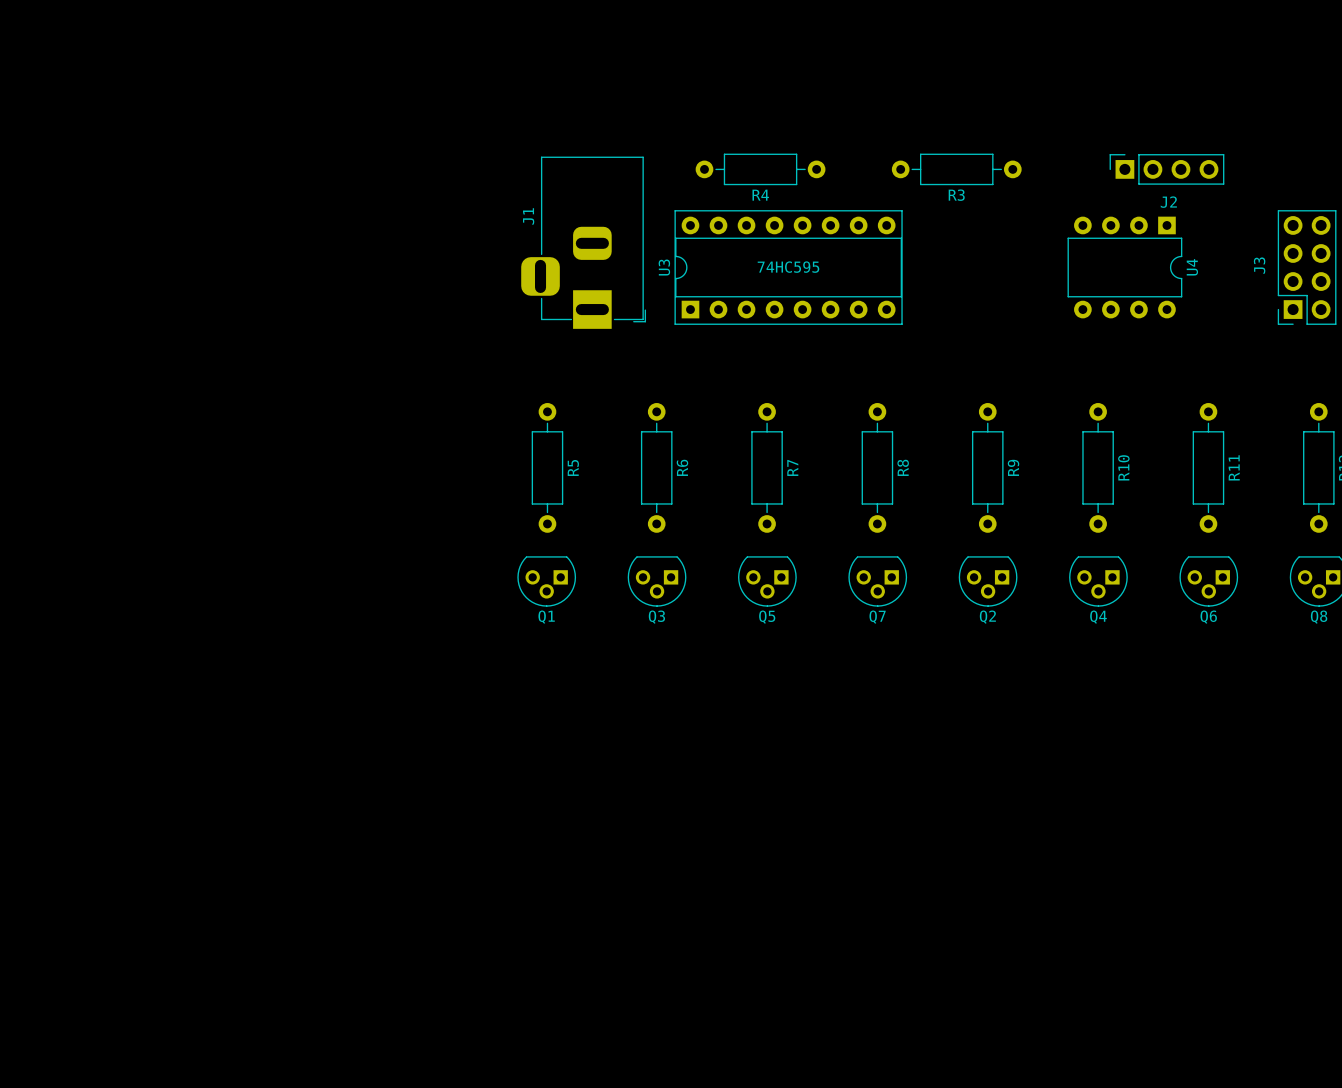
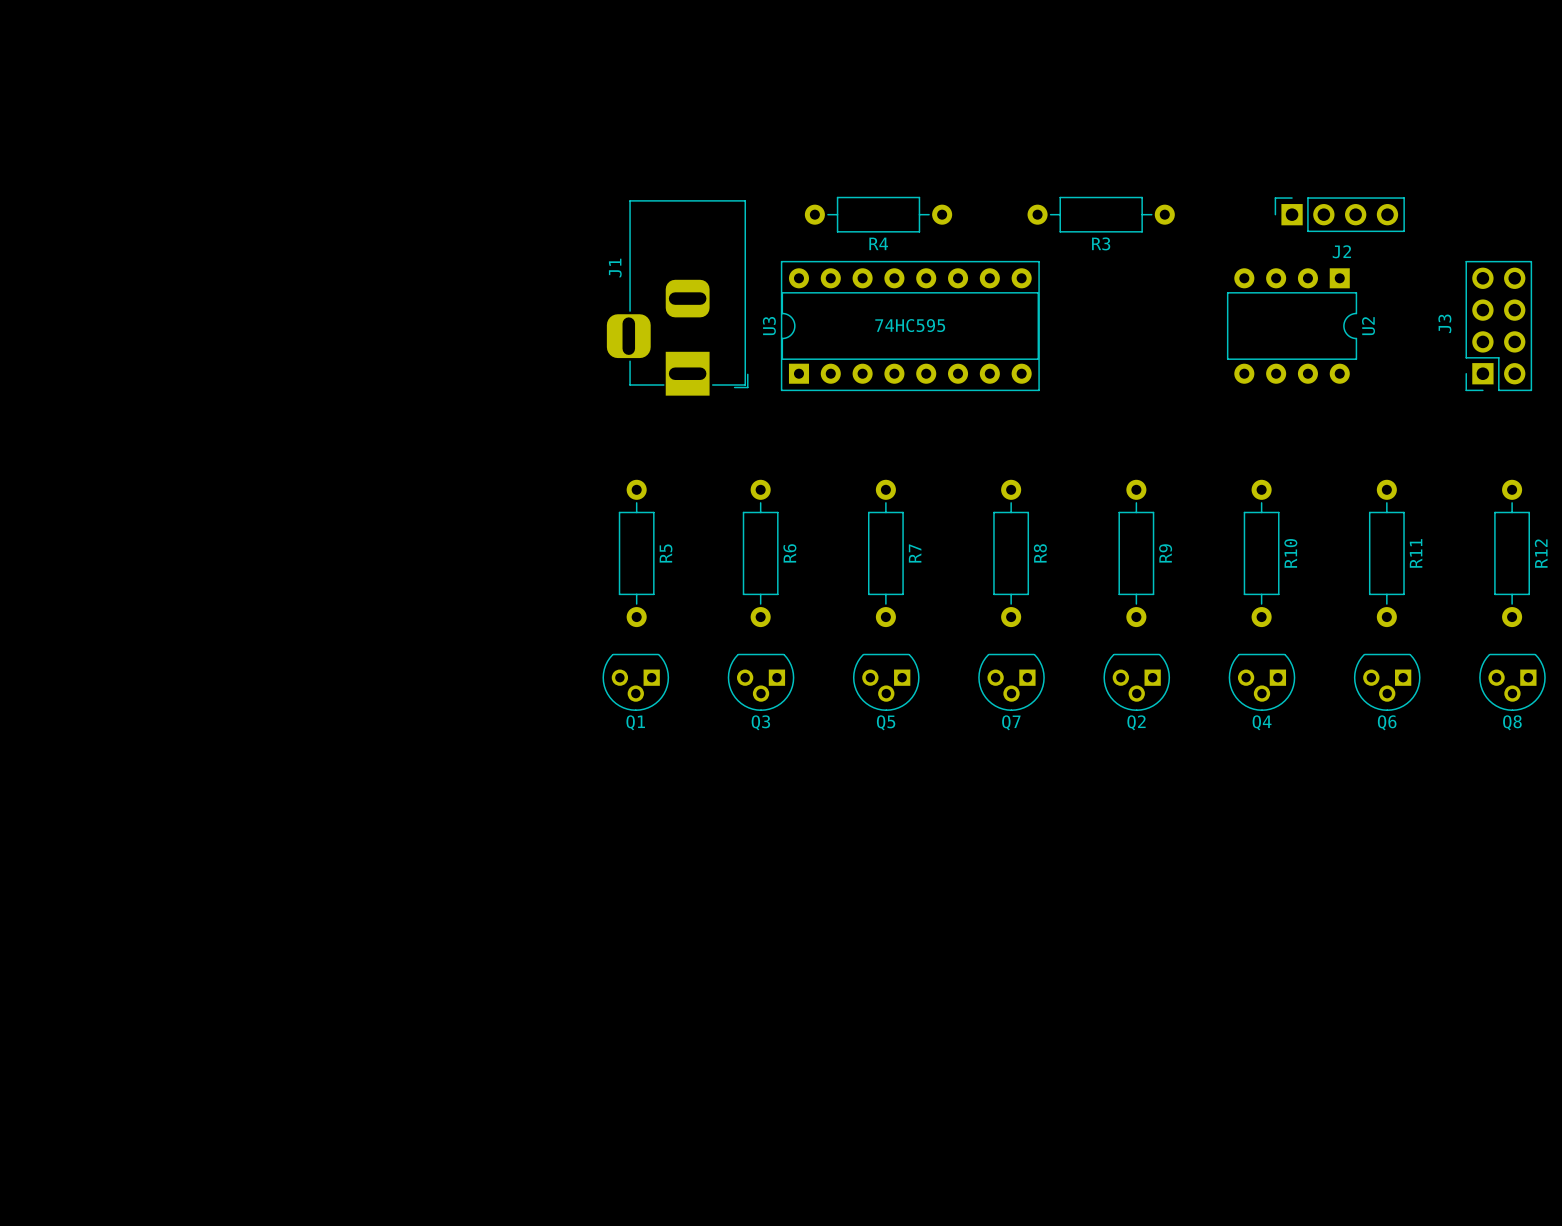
U4 name: U4 (1192, 267) -> U2 (1368, 326)

